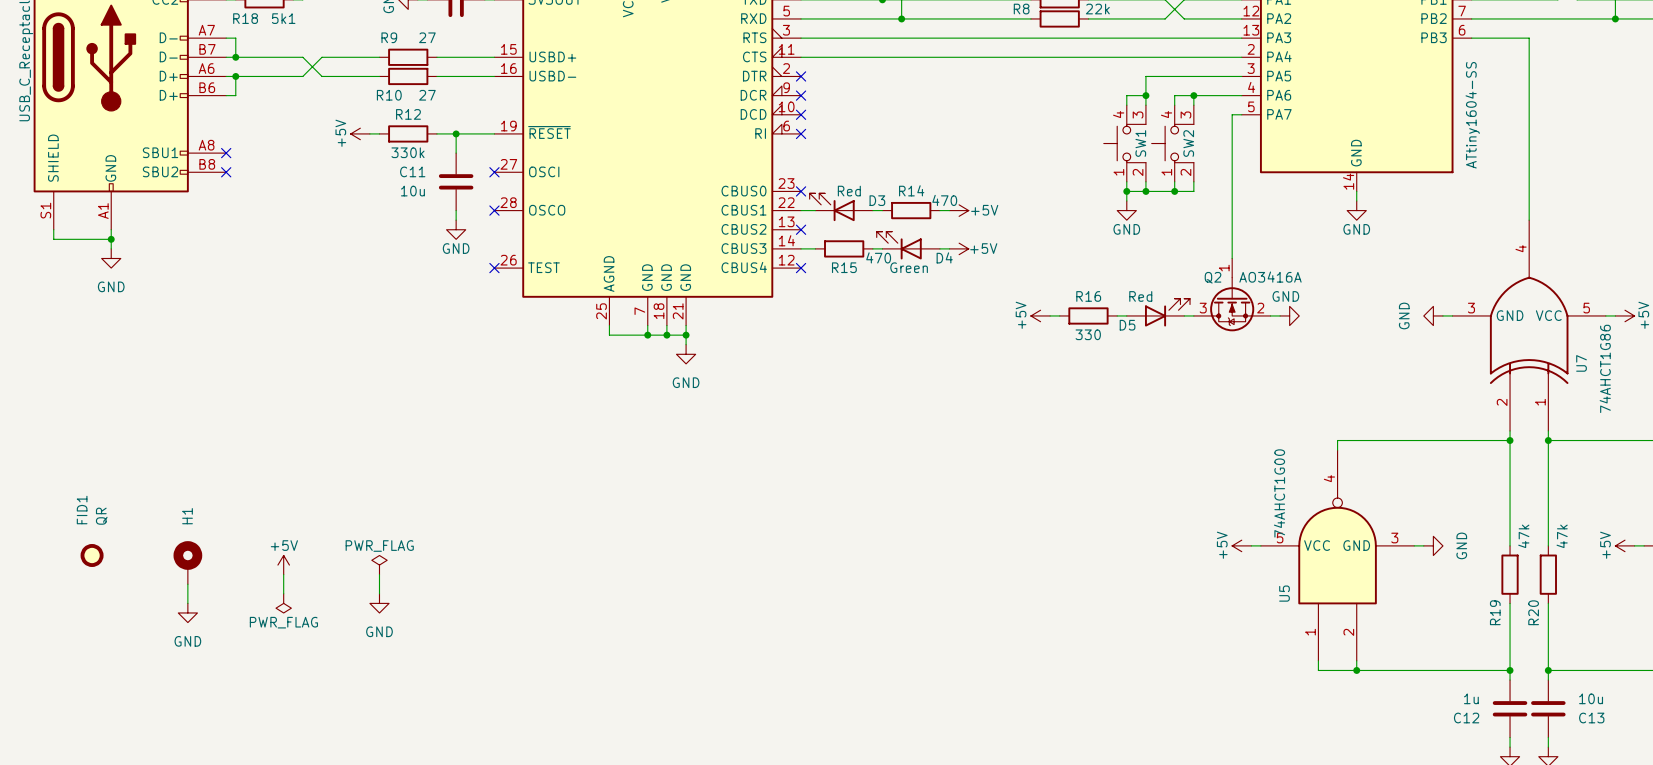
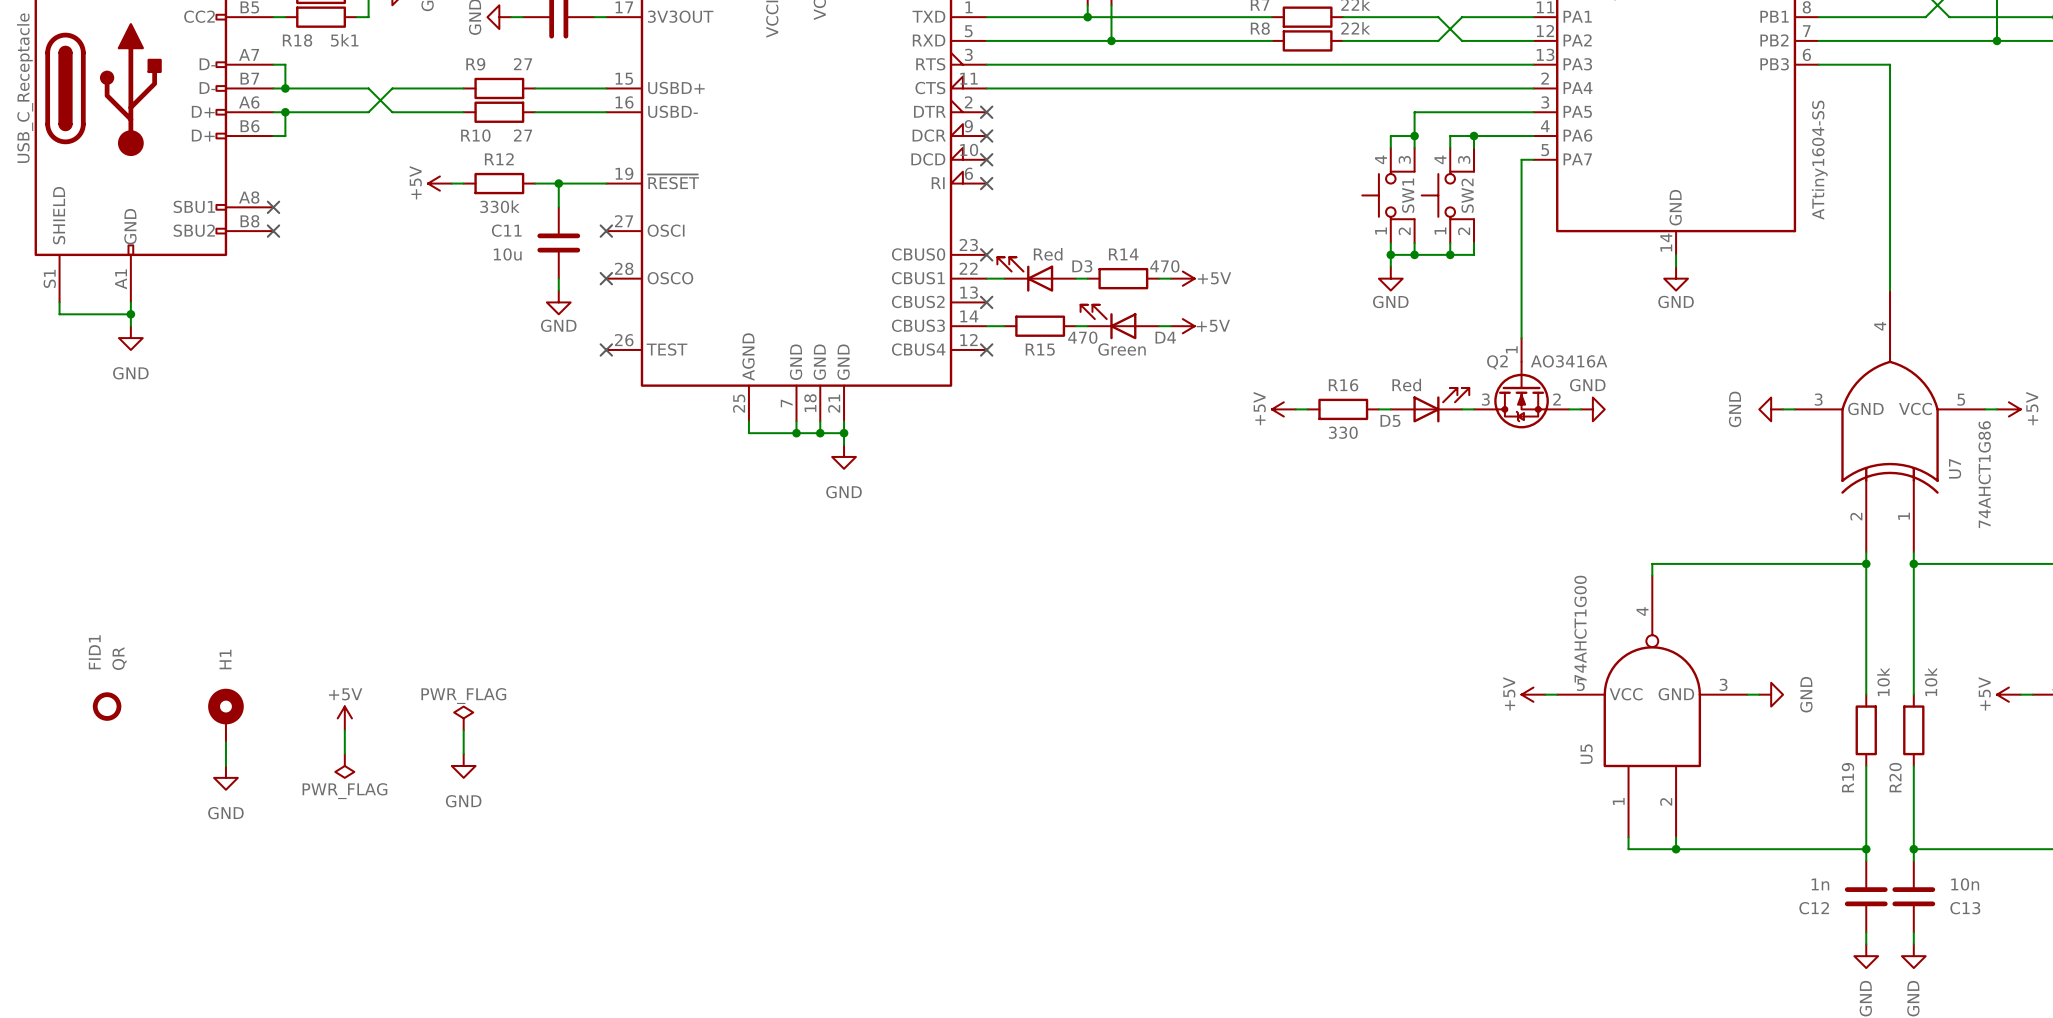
R19 value: 47k (1523, 536) -> 10k (1883, 681)
R20 value: 47k (1562, 536) -> 10k (1931, 681)
C12 value: 1u (1471, 698) -> 1n (1820, 884)
C13 value: 10u (1591, 698) -> 10n (1965, 884)

